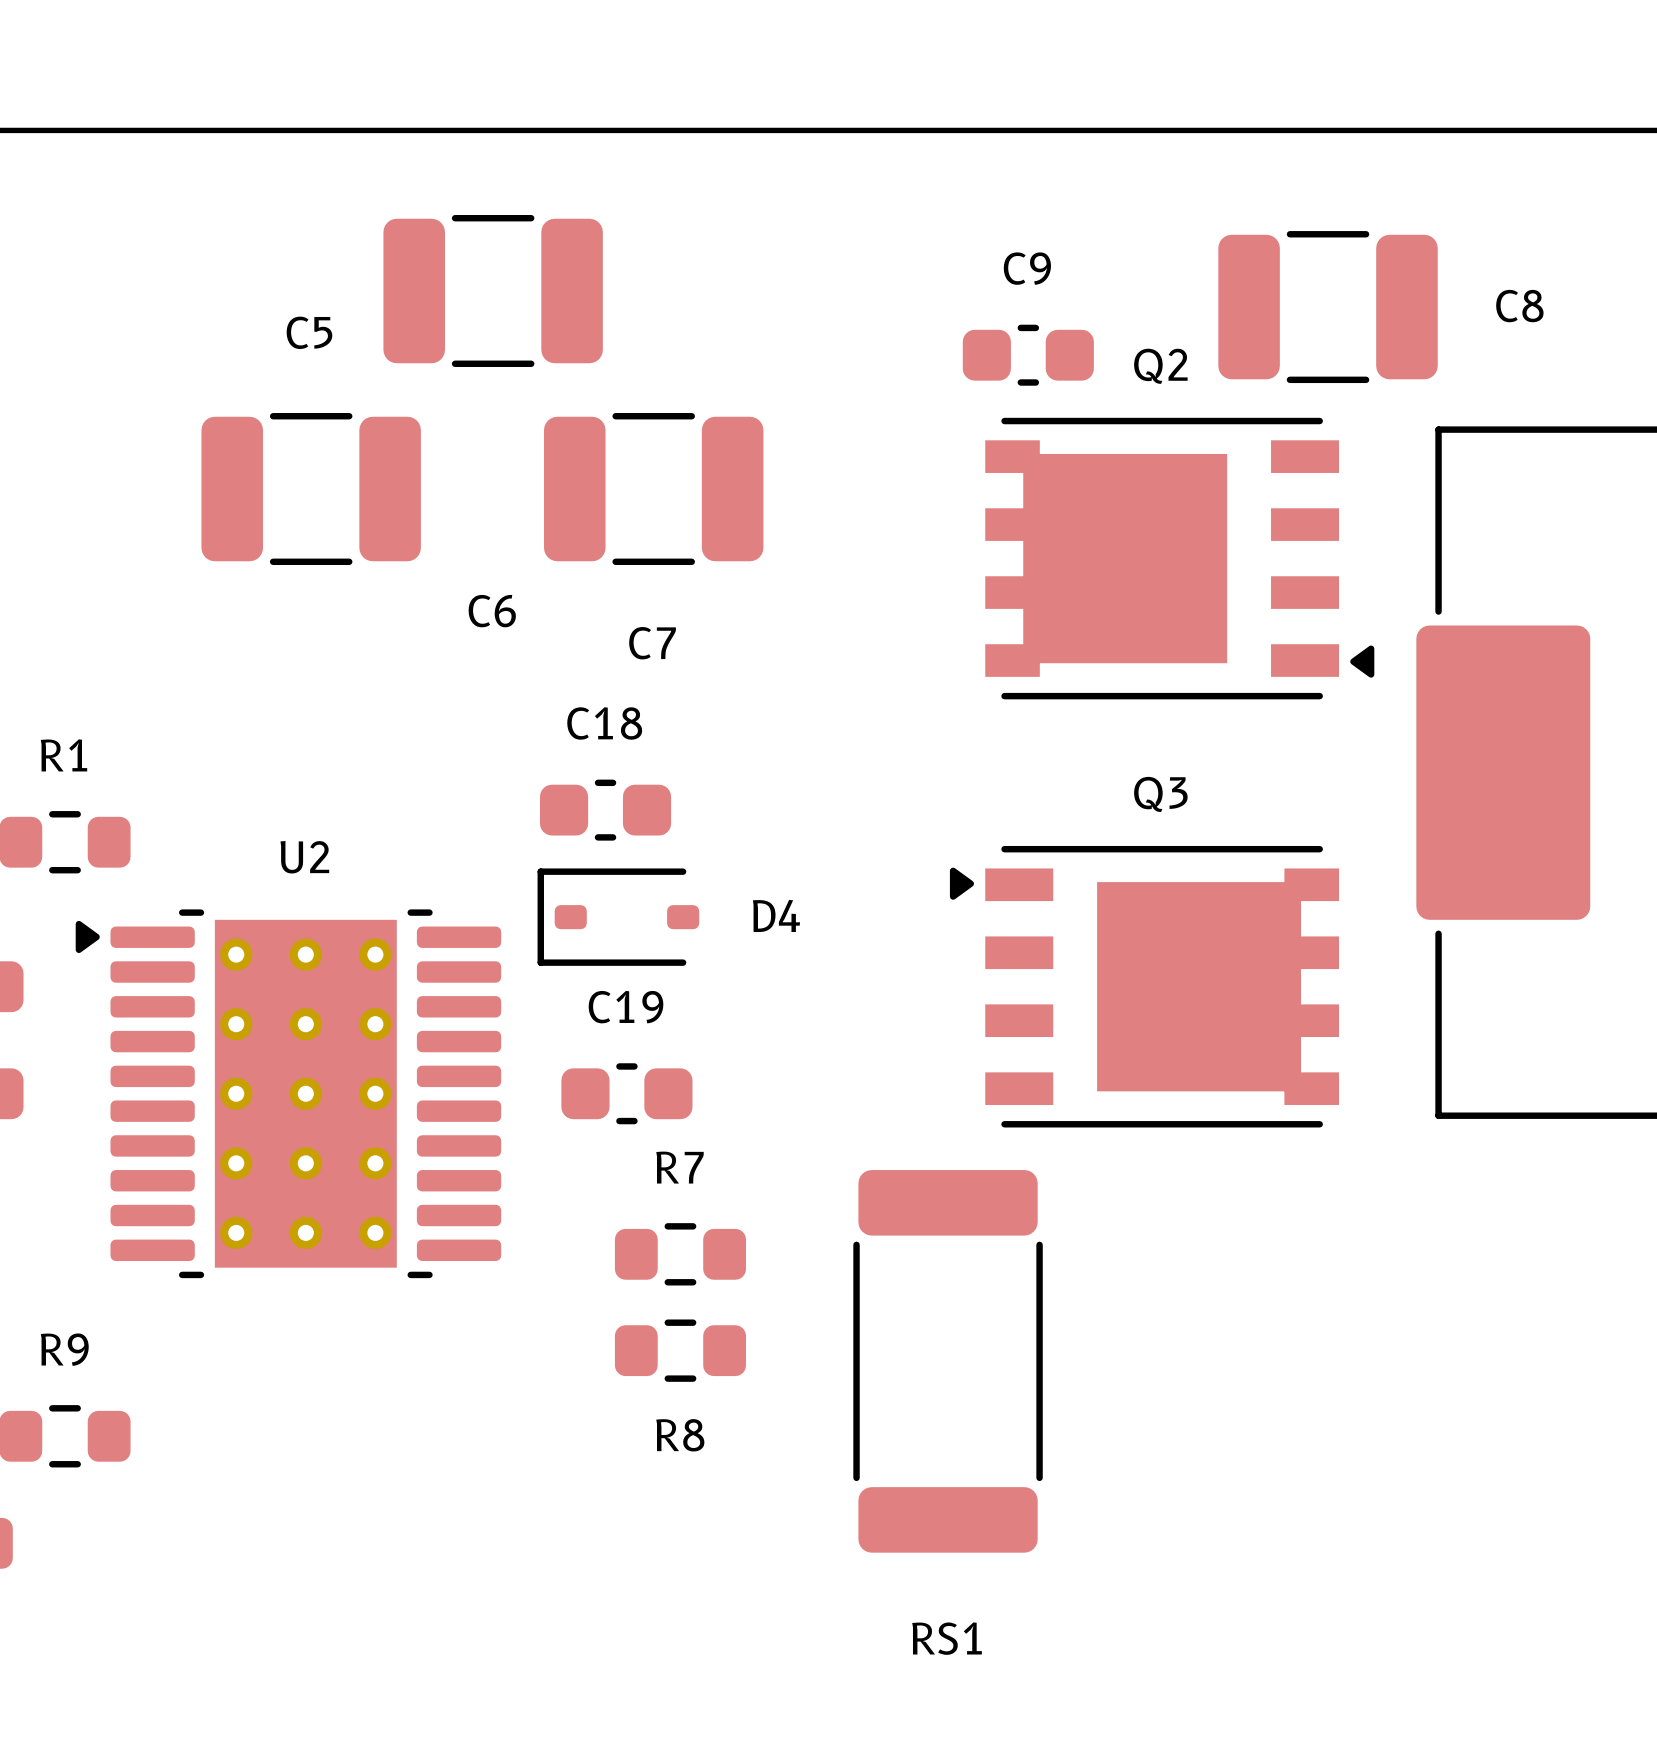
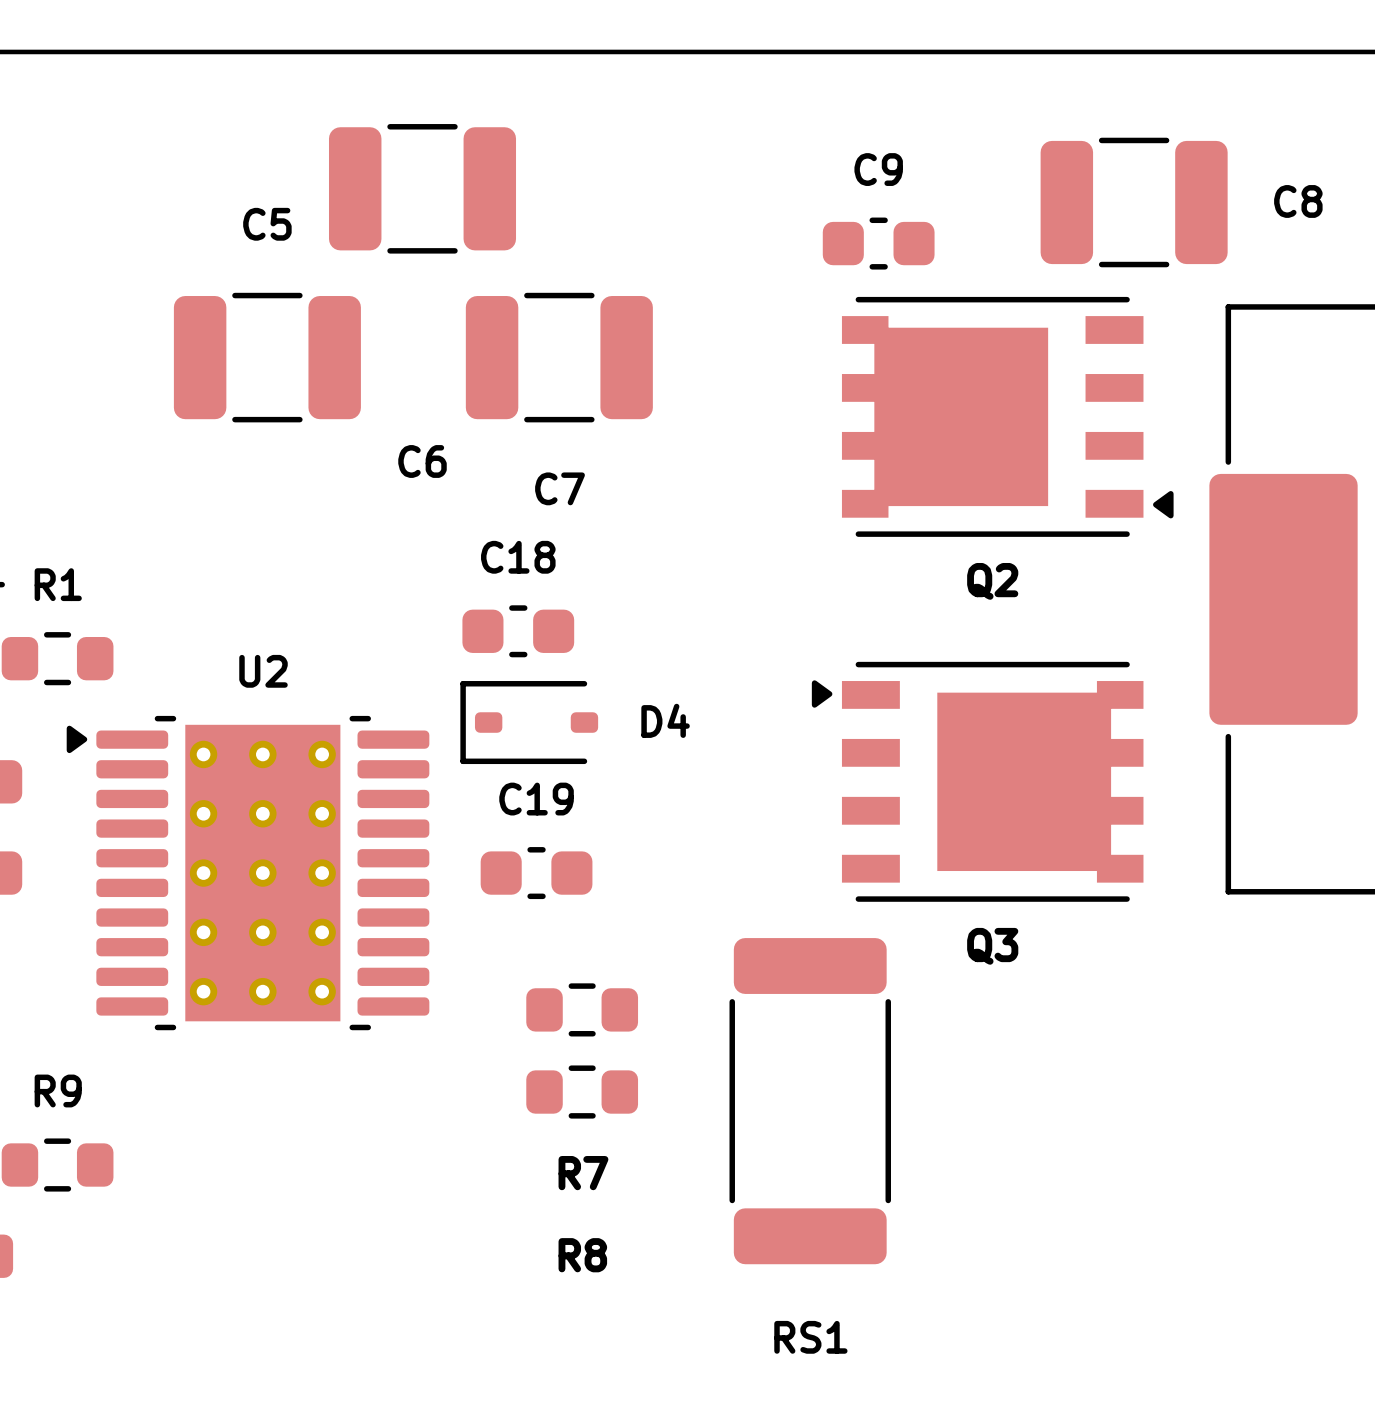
Q2 name position: Q2 (1160, 366) -> Q2 (992, 581)
Q3 name position: Q3 (1160, 794) -> Q3 (992, 946)
R7 name position: R7 (679, 1167) -> R7 (583, 1173)
R8 name position: R8 (680, 1435) -> R8 (582, 1255)

